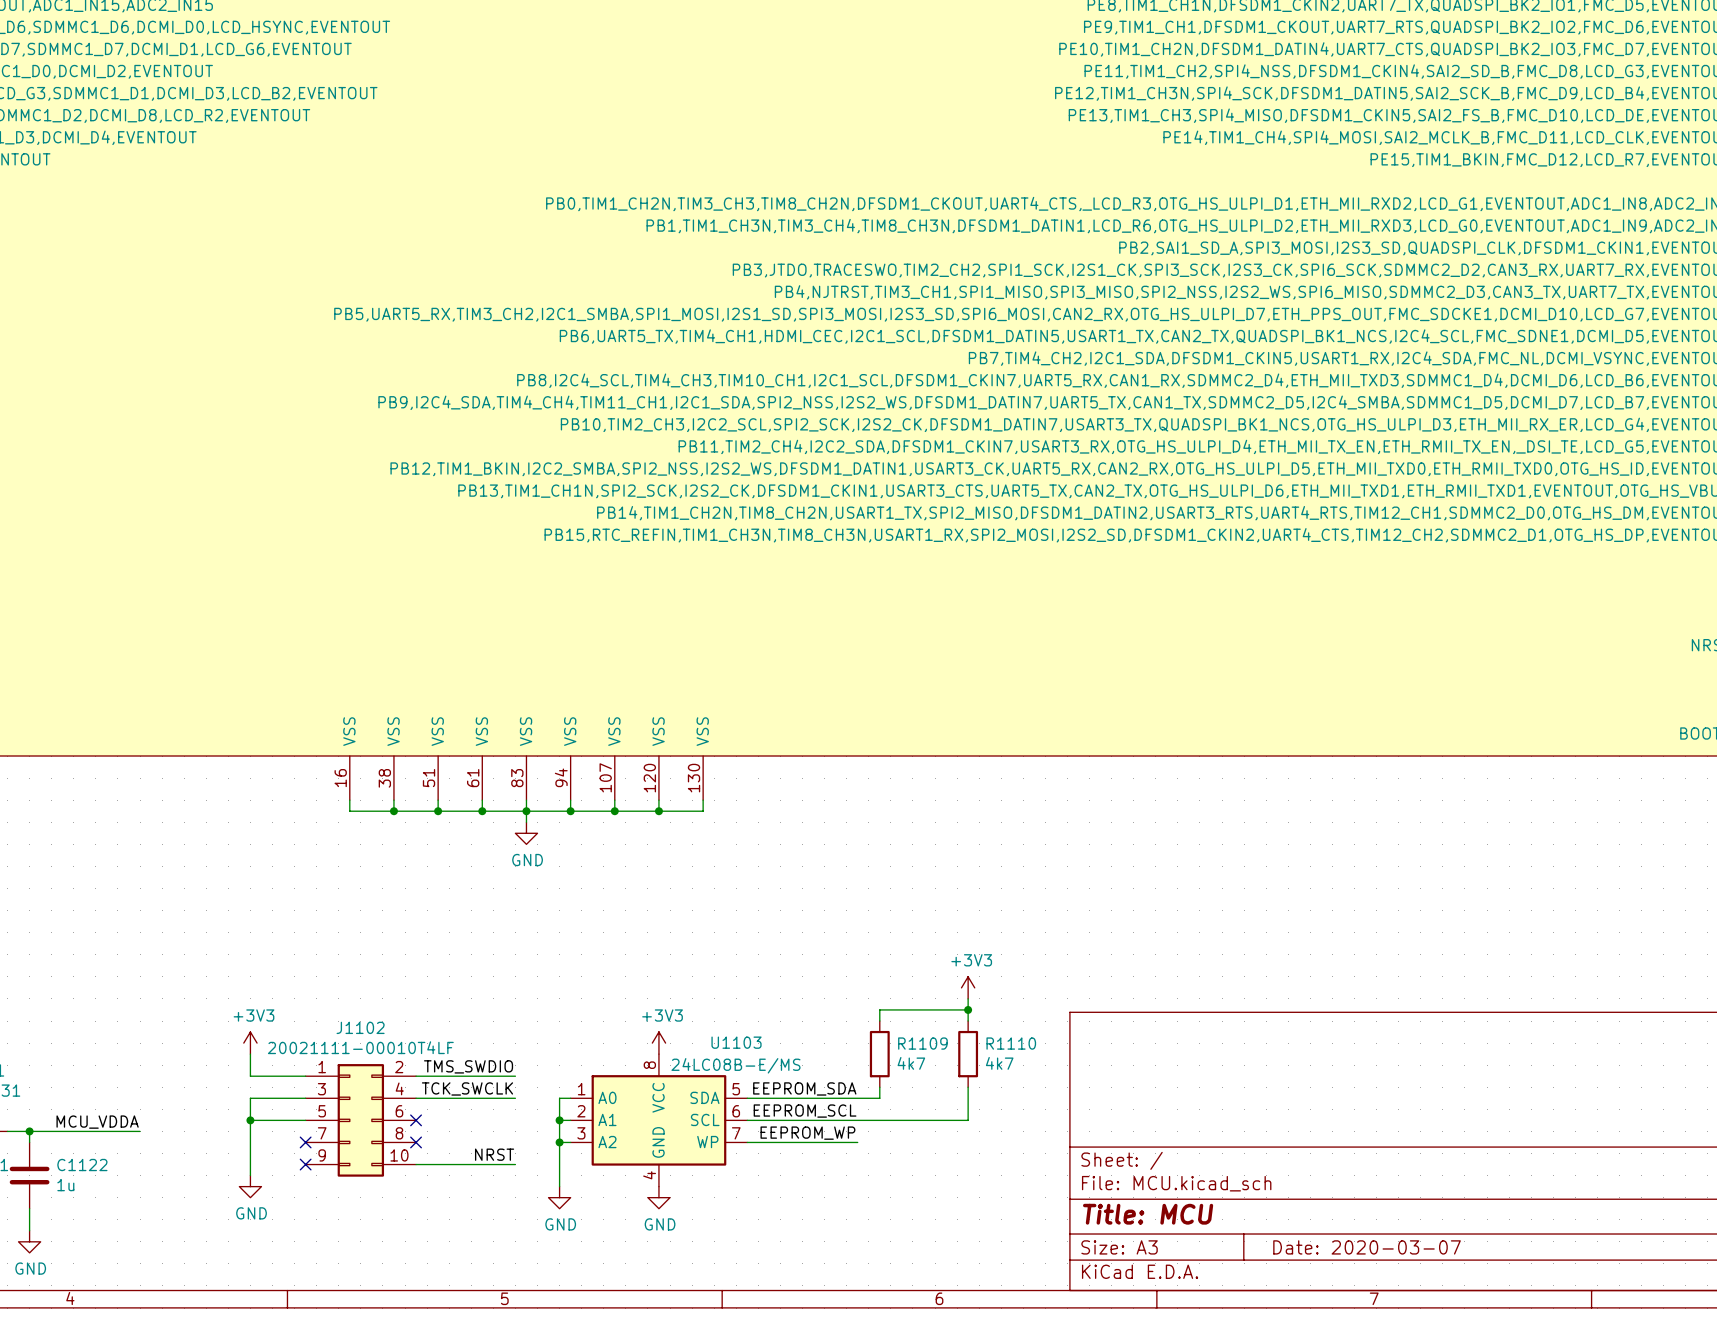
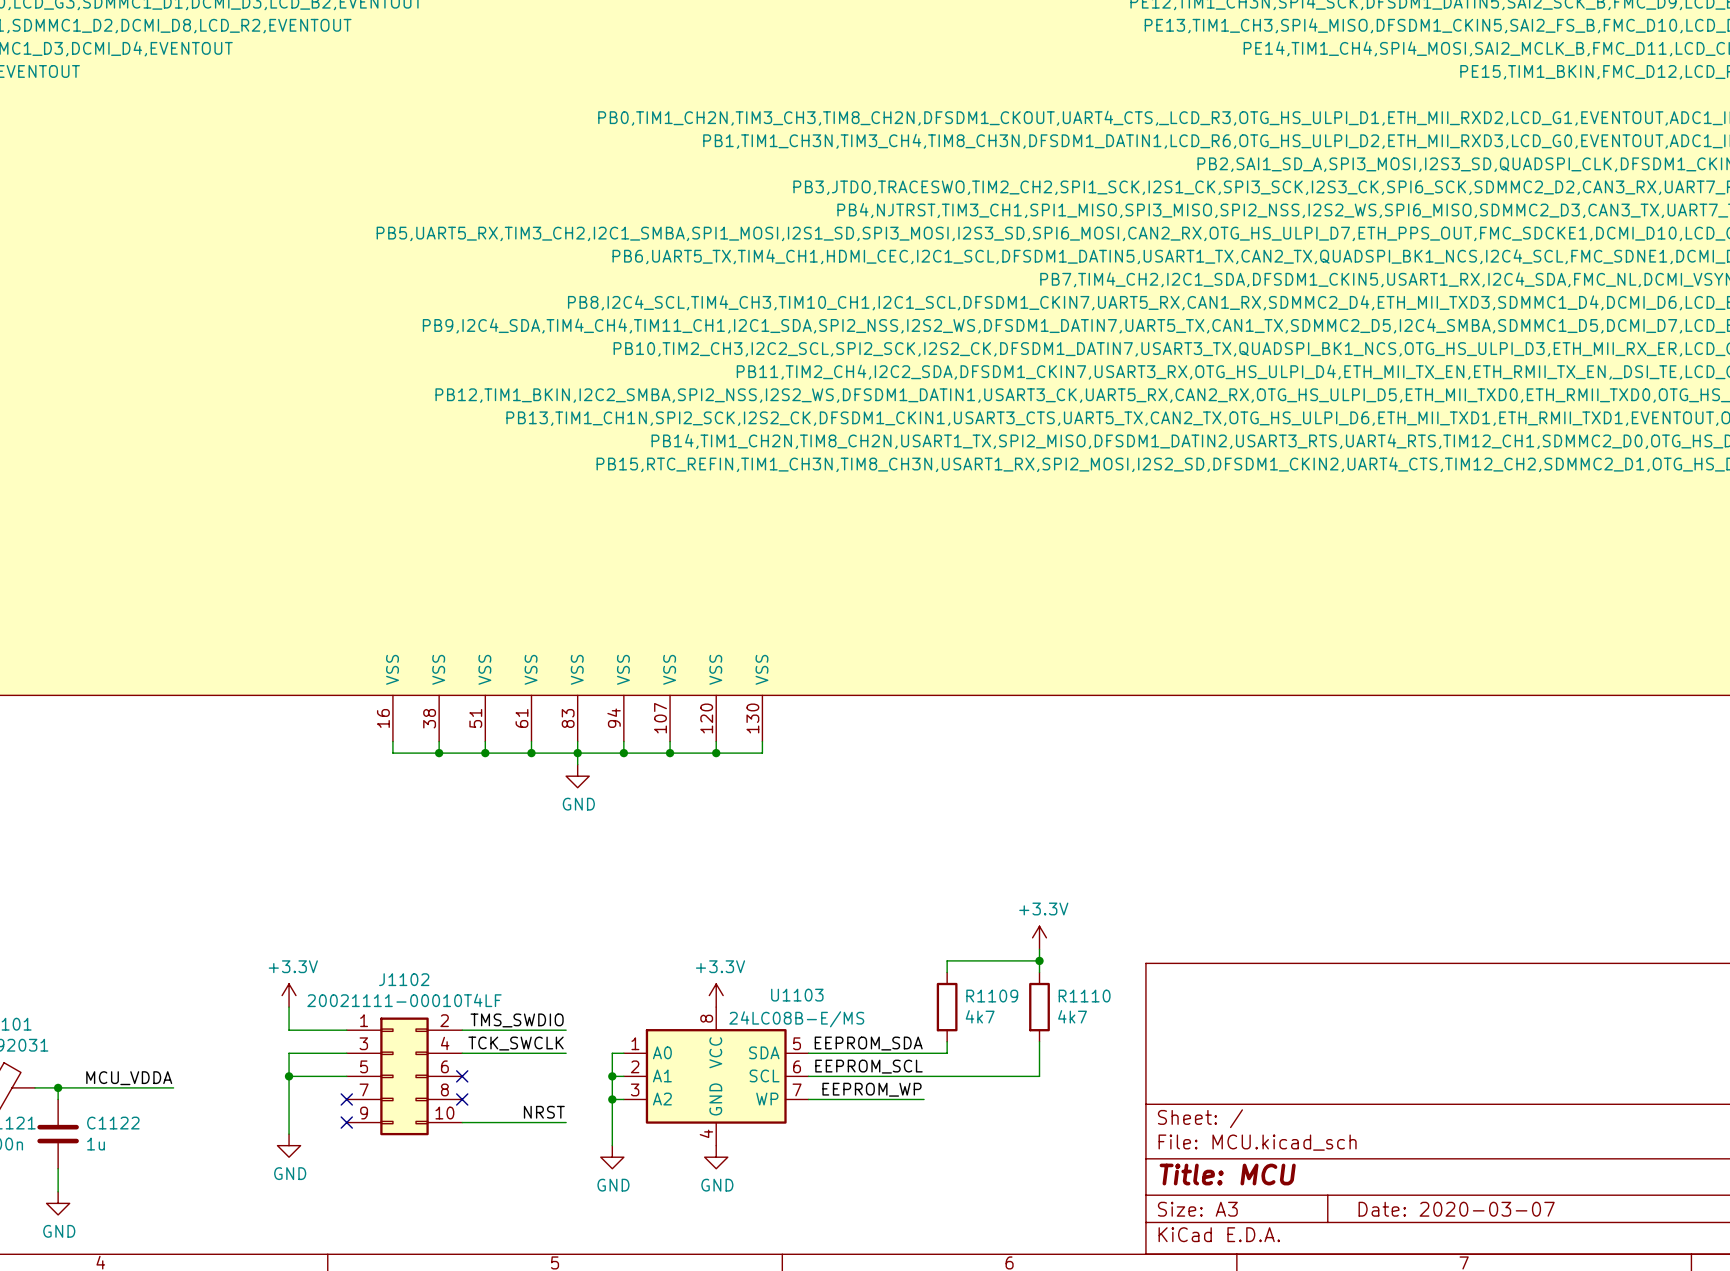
power symbol: +3V3 (968, 987) -> +3.3V (1039, 937)
power symbol: +3V3 (250, 1043) -> +3.3V (289, 995)
power symbol: +3V3 (658, 1043) -> +3.3V (716, 995)

